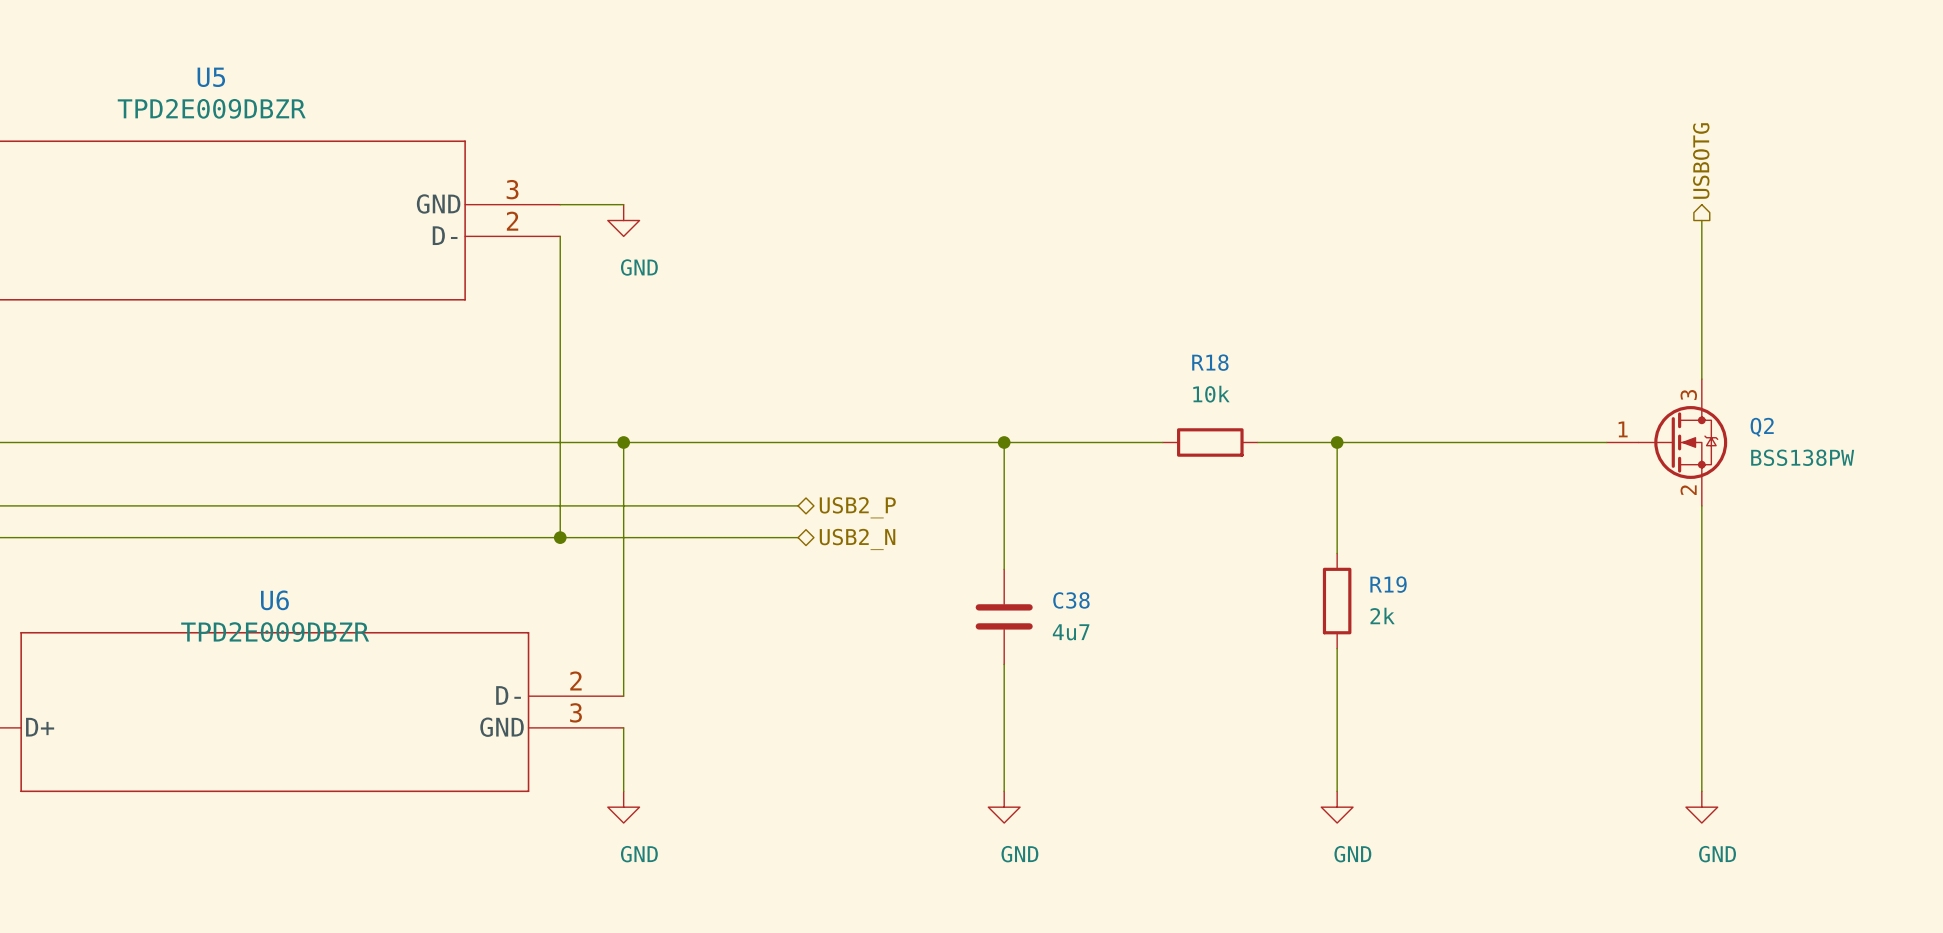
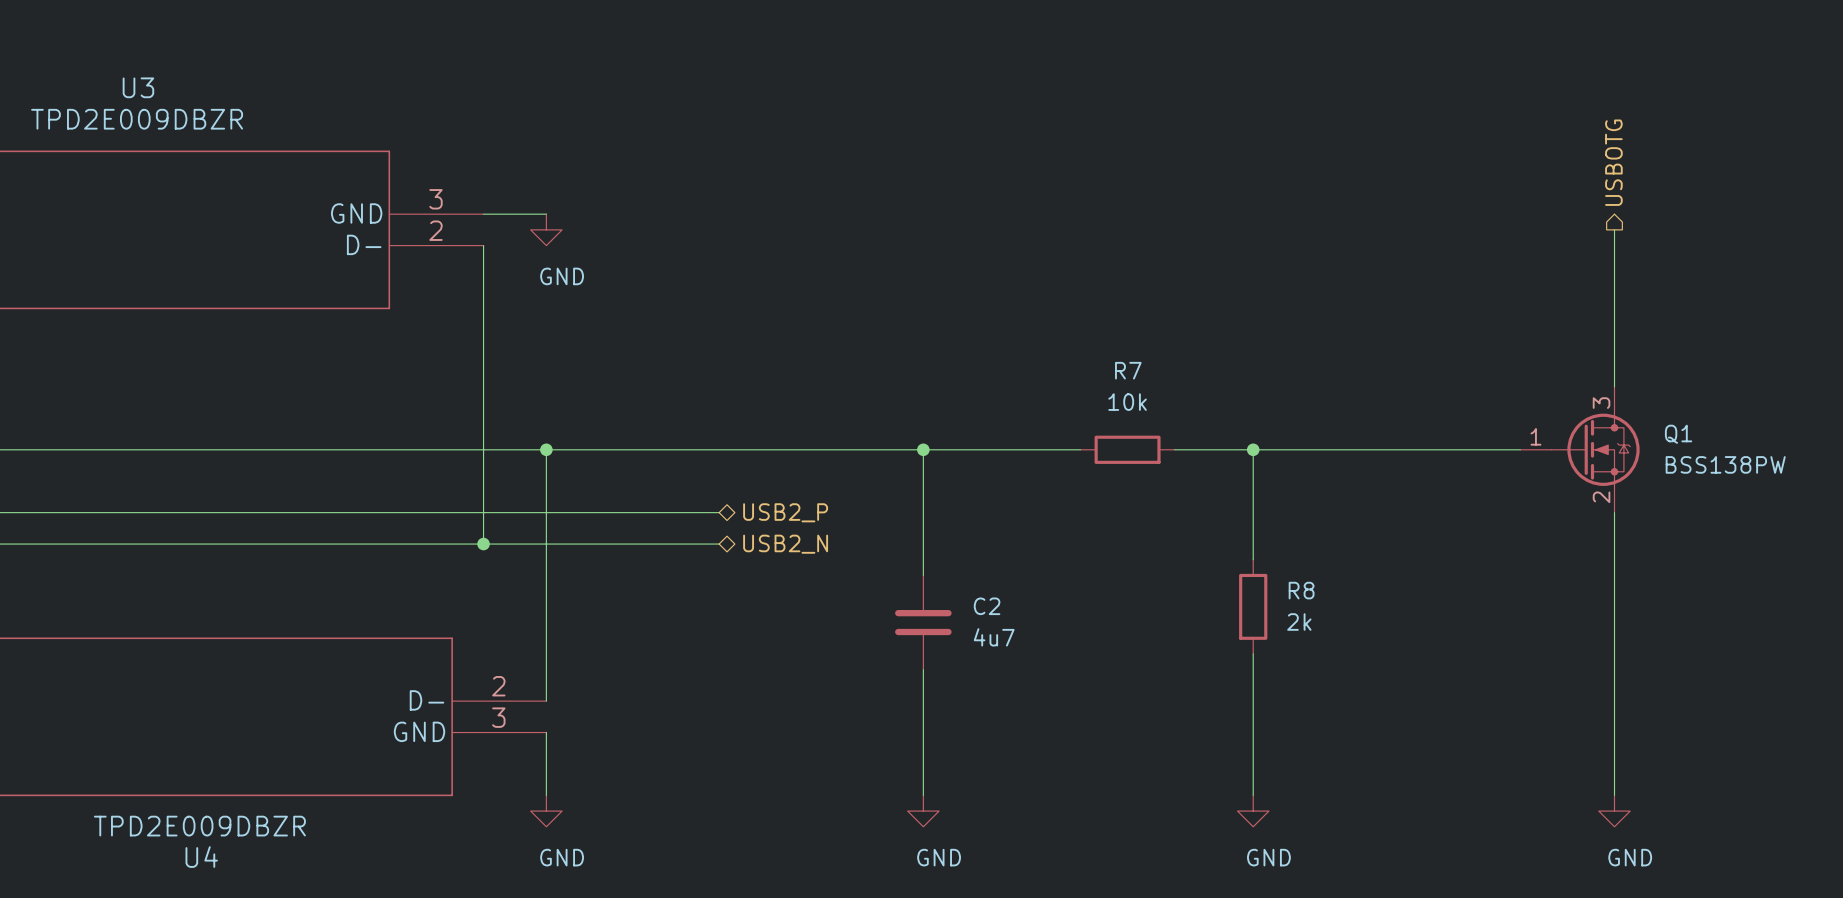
U5 name: U5 (211, 77) -> U3 (138, 87)
R18 name: R18 (1210, 362) -> R7 (1128, 370)
Q2 name: Q2 (1762, 427) -> Q1 (1678, 434)
R19 name: R19 (1388, 584) -> R8 (1301, 590)
U6 name: U6 (274, 600) -> U4 (201, 857)
C38 name: C38 (1071, 600) -> C2 (987, 606)
U6 value position: TPD2E009DBZR (275, 632) -> TPD2E009DBZR (199, 826)

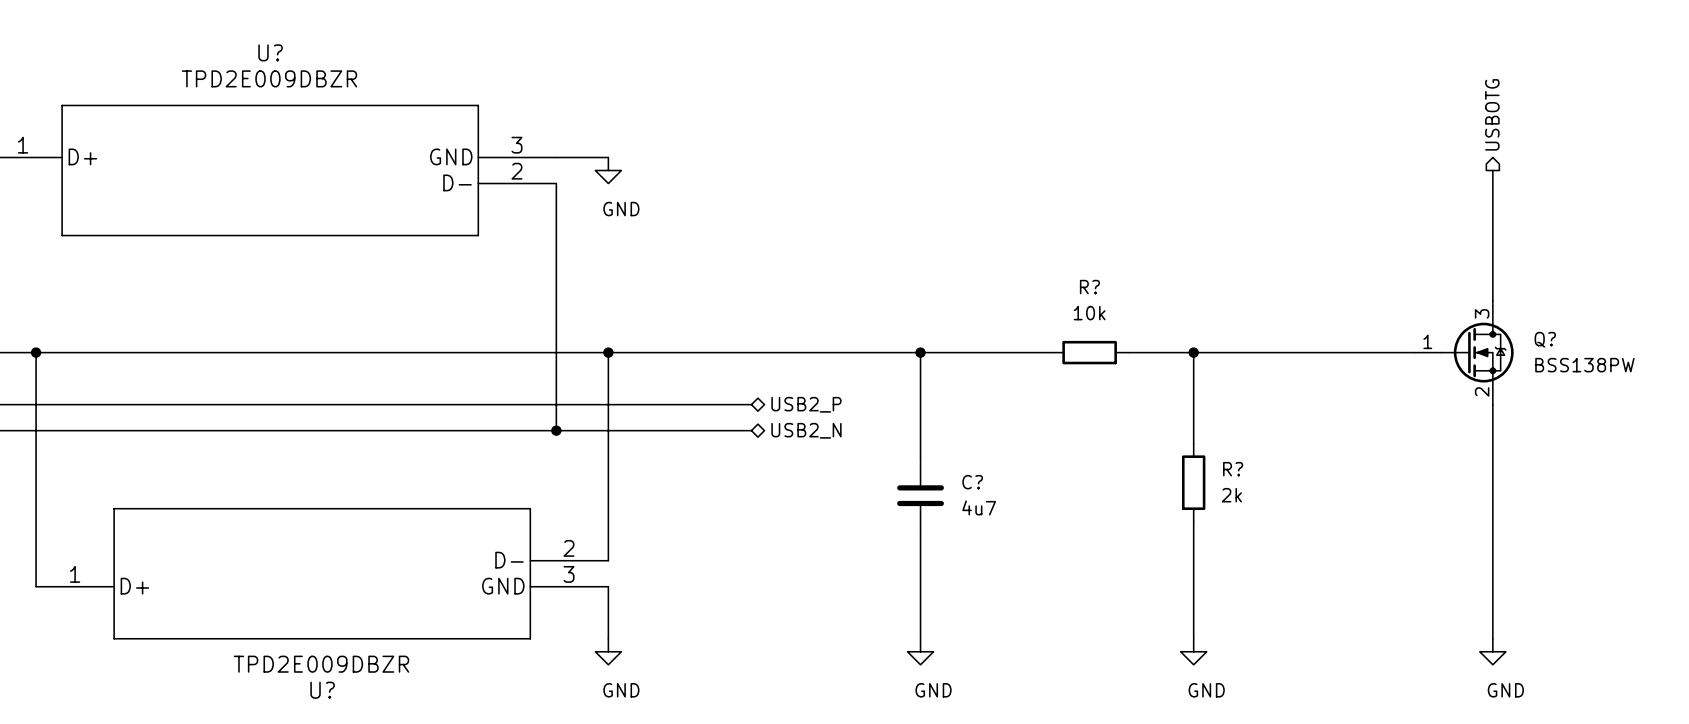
U3 name: U3 (138, 87) -> U? (270, 52)
R7 name: R7 (1128, 370) -> R? (1089, 287)
Q1 name: Q1 (1678, 434) -> Q? (1545, 339)
R8 name: R8 (1301, 590) -> R? (1233, 469)
C2 name: C2 (987, 606) -> C? (972, 482)
U4 name: U4 (201, 857) -> U? (322, 690)

